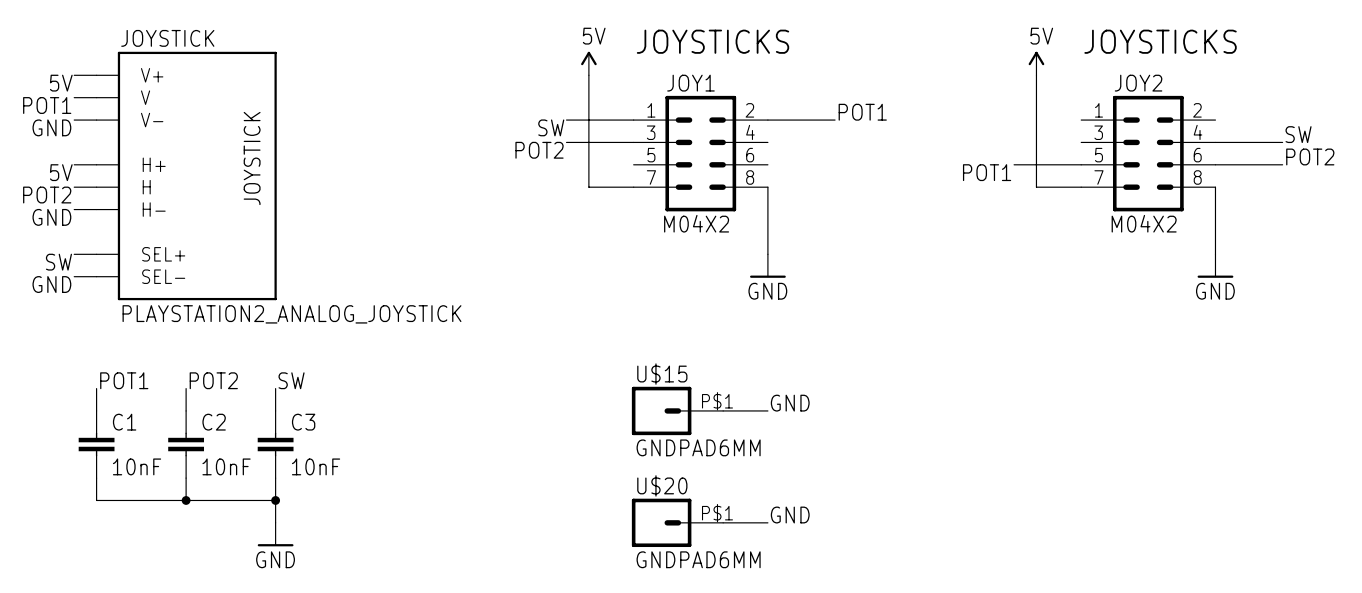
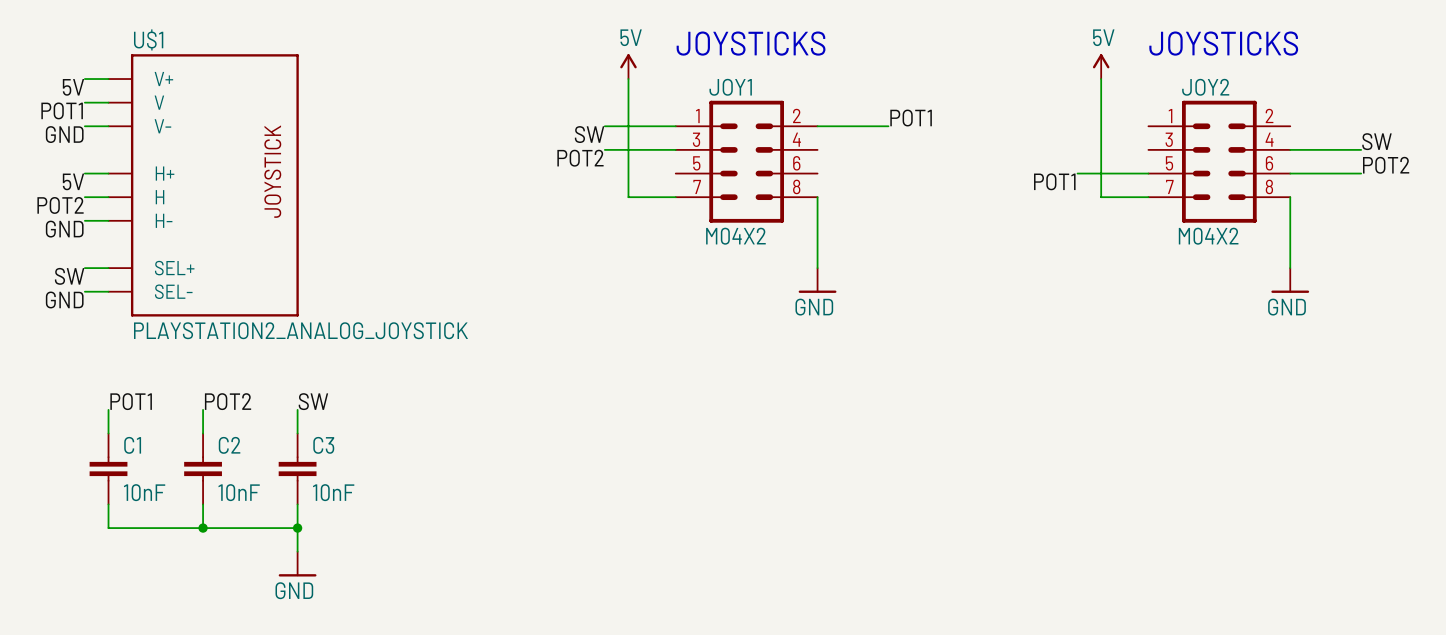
JOYSTICK name: JOYSTICK (167, 38) -> U$1 (148, 39)
label: GND (790, 403) -> none
U$15: GNDPAD6MM (677, 410) -> none
wire: (723, 410) (767, 410) -> none
label: GND (790, 515) -> none
U$20: GNDPAD6MM (677, 522) -> none
wire: (723, 522) (767, 522) -> none

